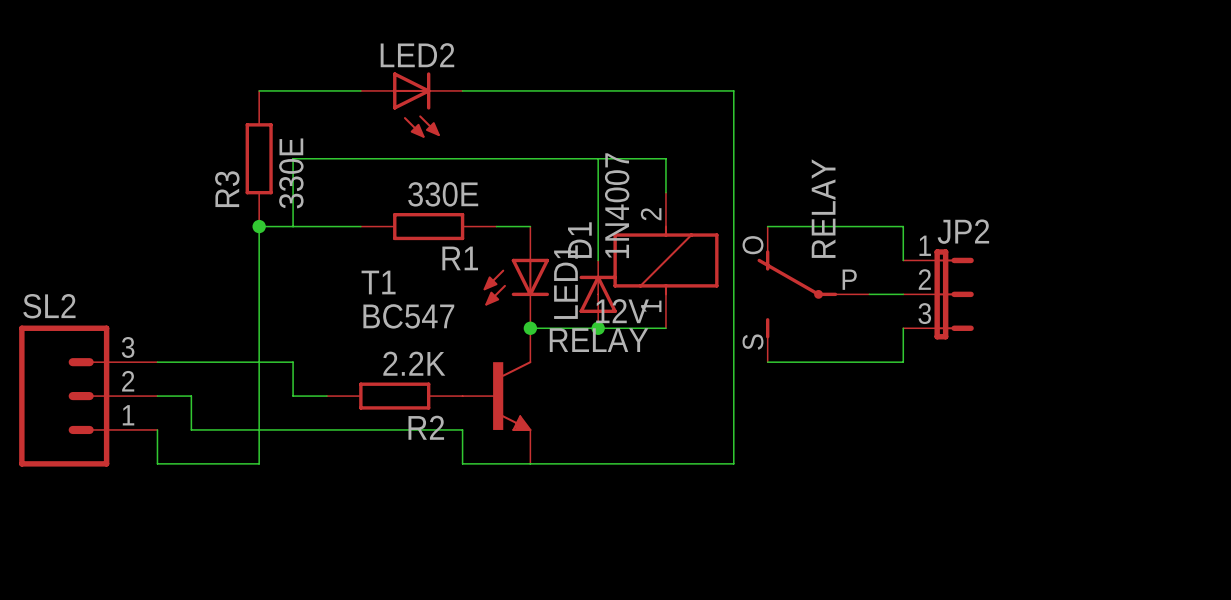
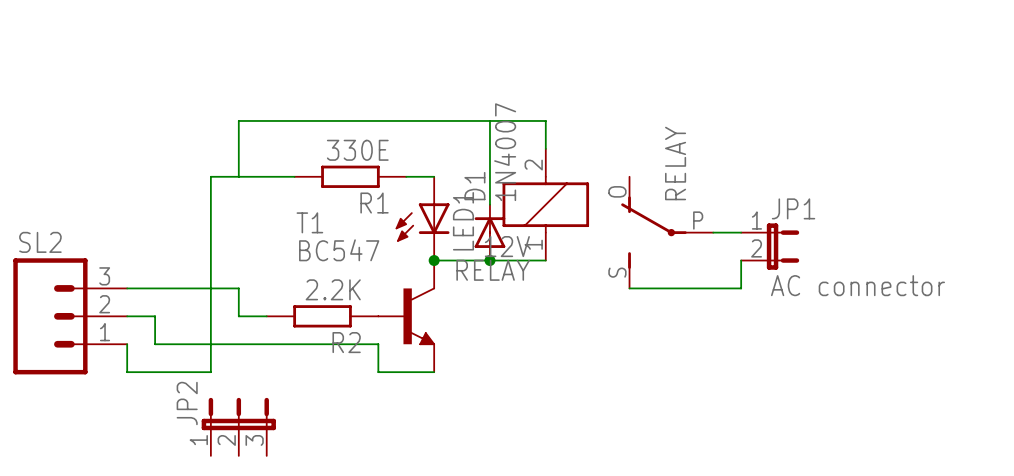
wire: (259, 90) (360, 90) -> none
wire: (462, 90) (733, 90) (733, 463) (530, 463) -> none
LED2: (411, 105) -> none
R3: 330E (259, 158) -> none
junction: (259, 226) -> none
wire: (767, 226) (903, 226) (903, 260) -> none
JP2 position: (938, 294) -> (238, 426)
JP2 rotation: 0° (954, 294) -> 90° counterclockwise (238, 414)
JP1: none -> AC connector (770, 246)

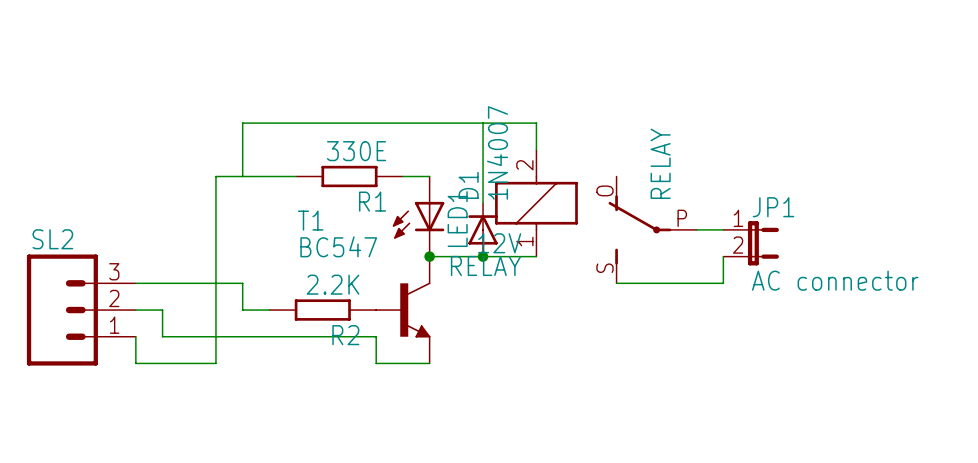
JP2: (238, 426) -> none

